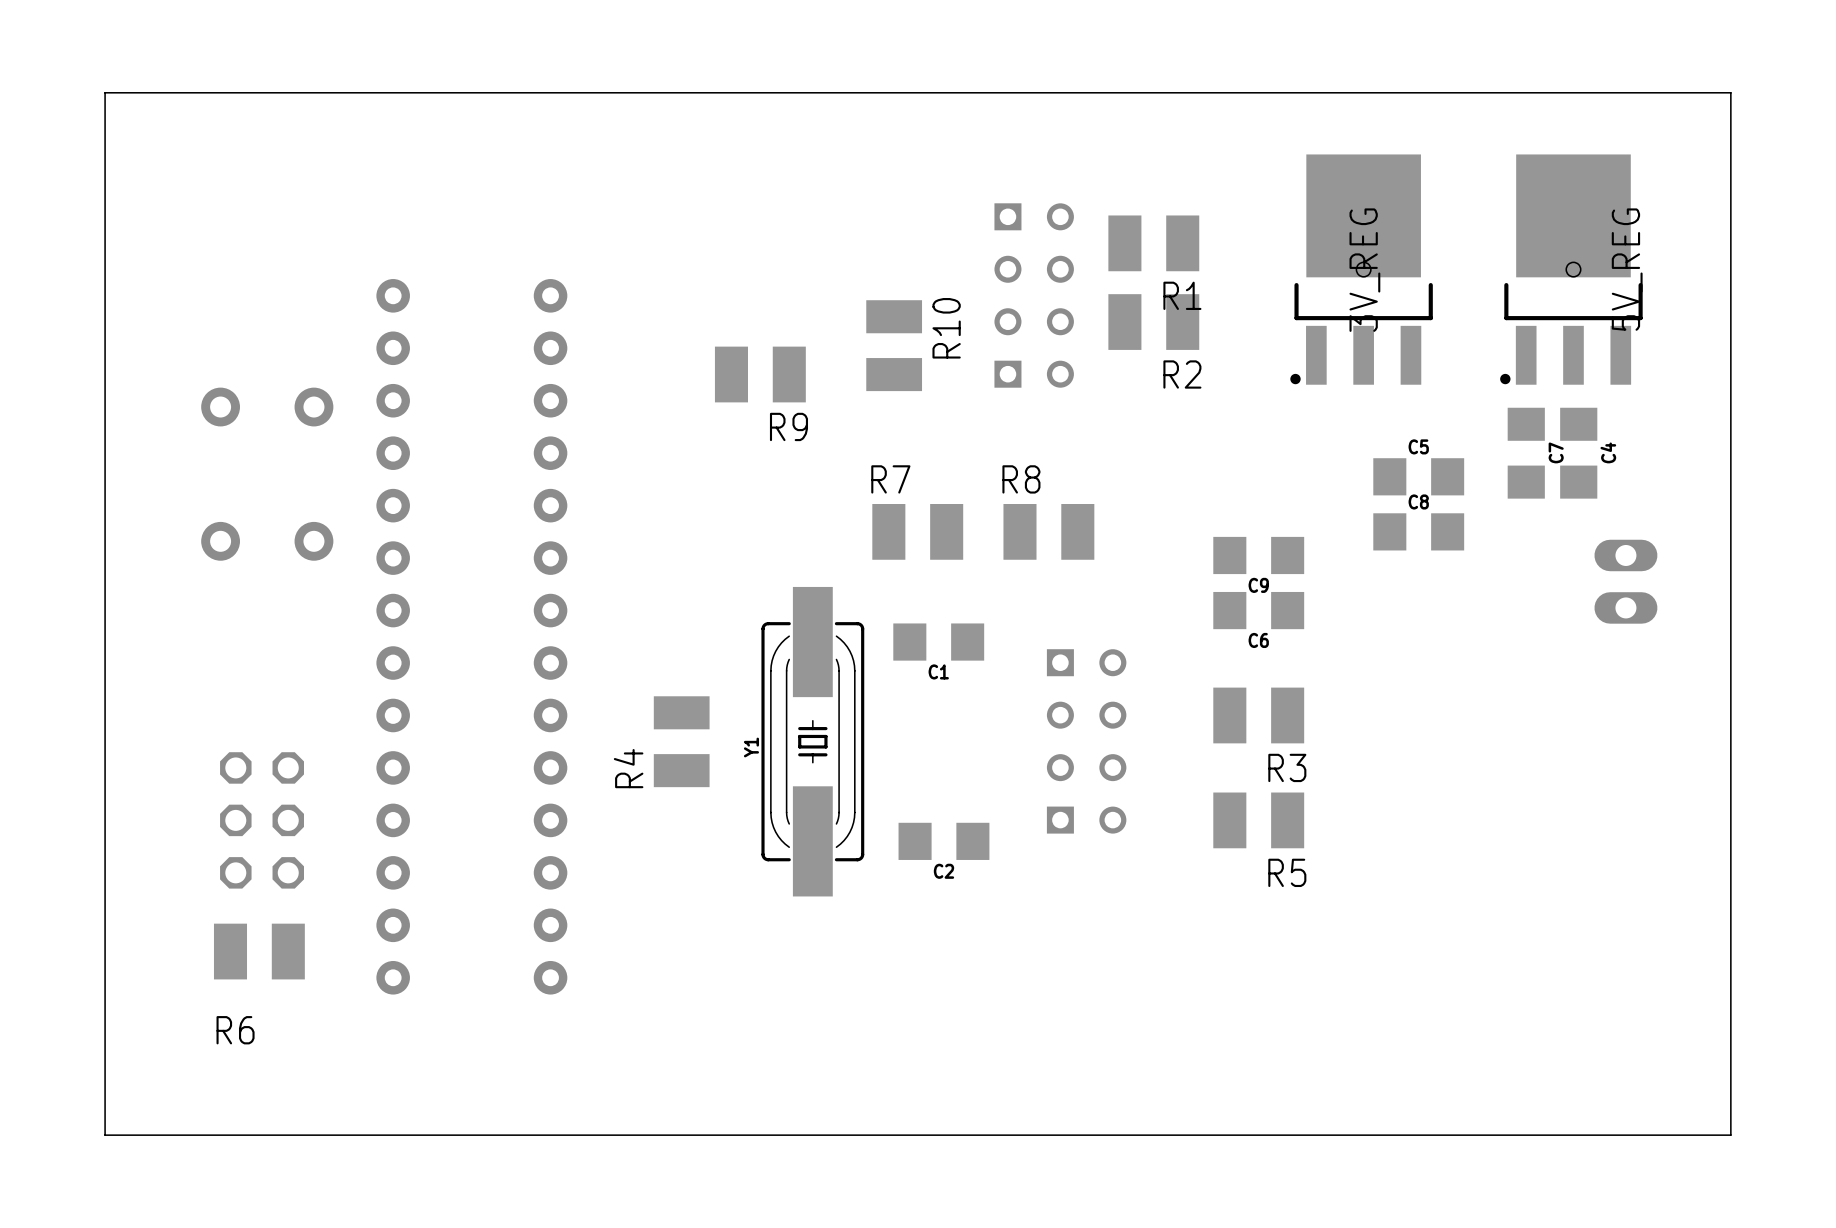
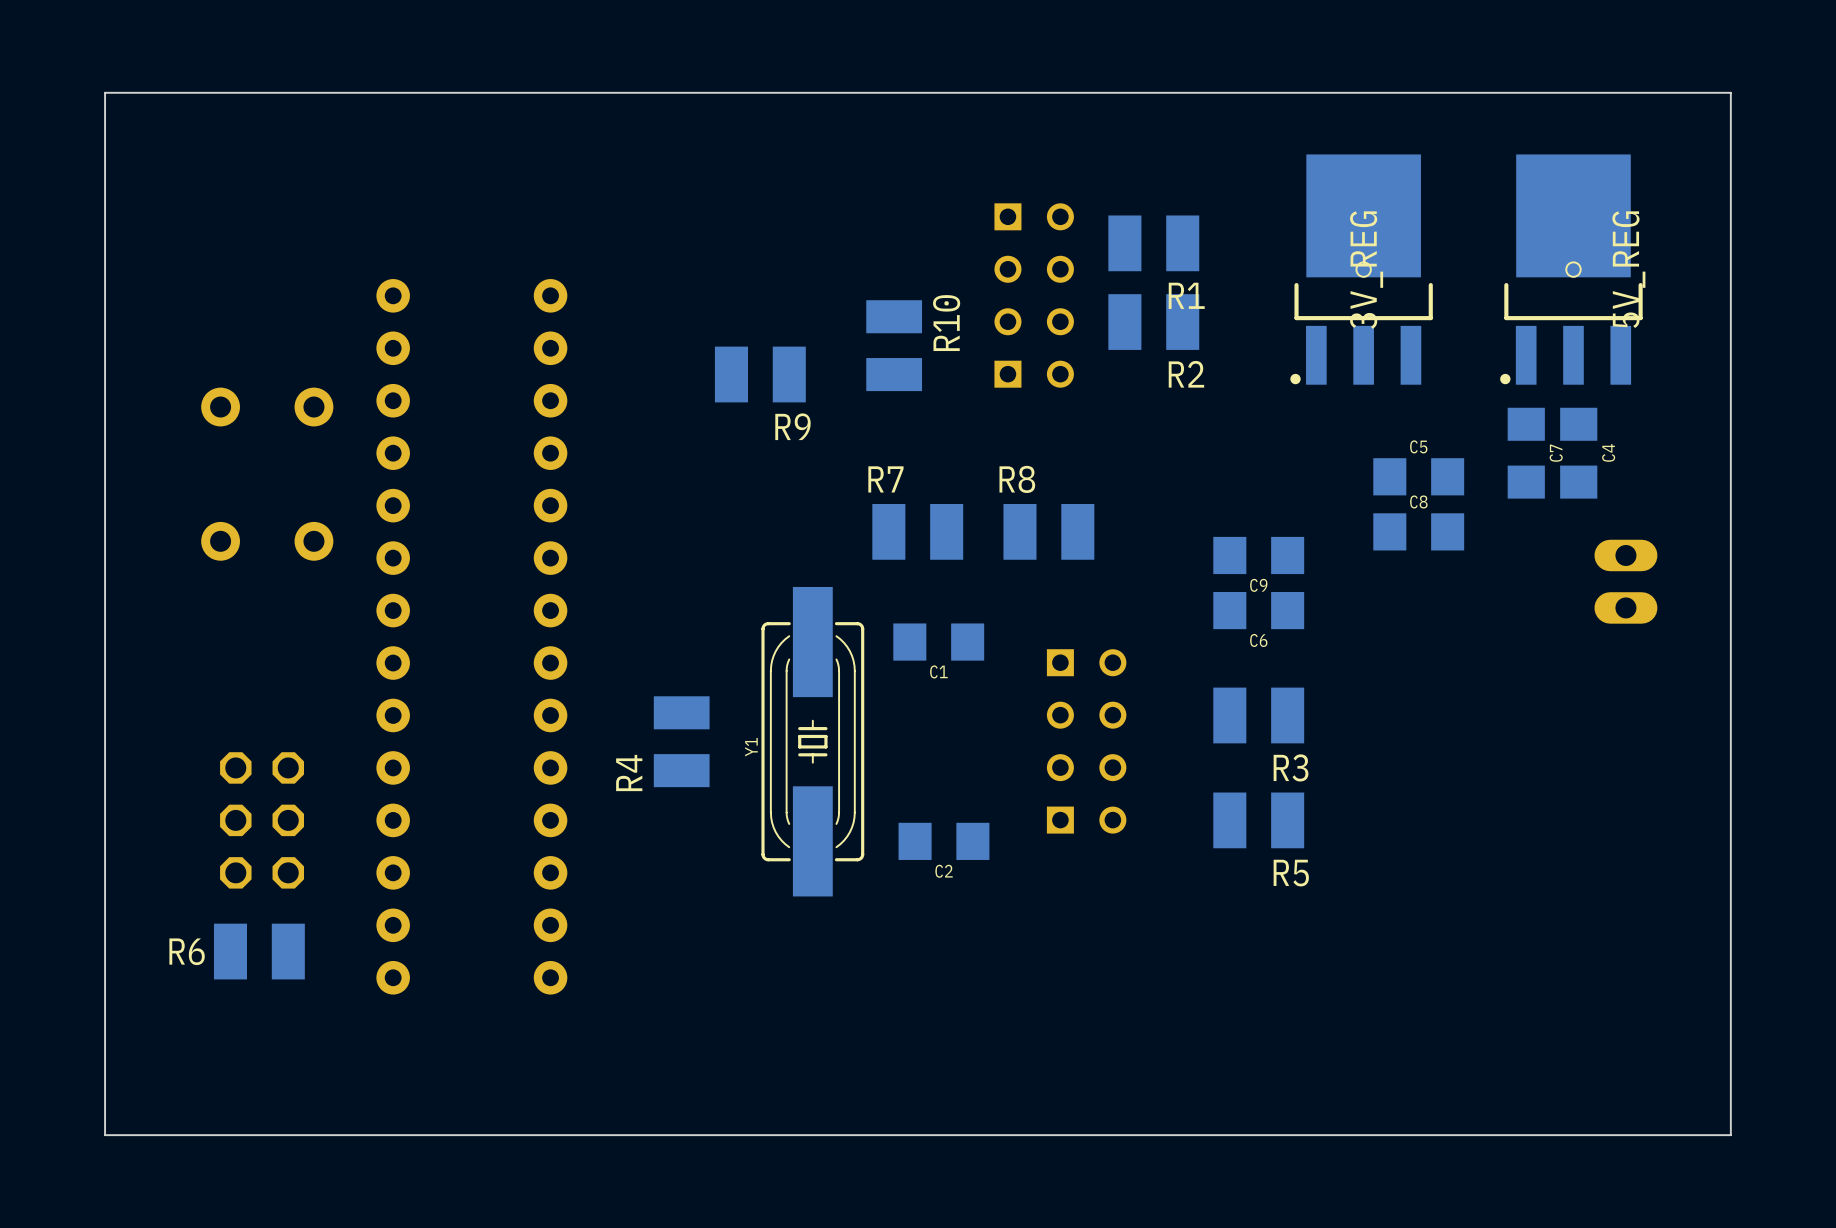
R6 name position: R6 (235, 1030) -> R6 (187, 951)

